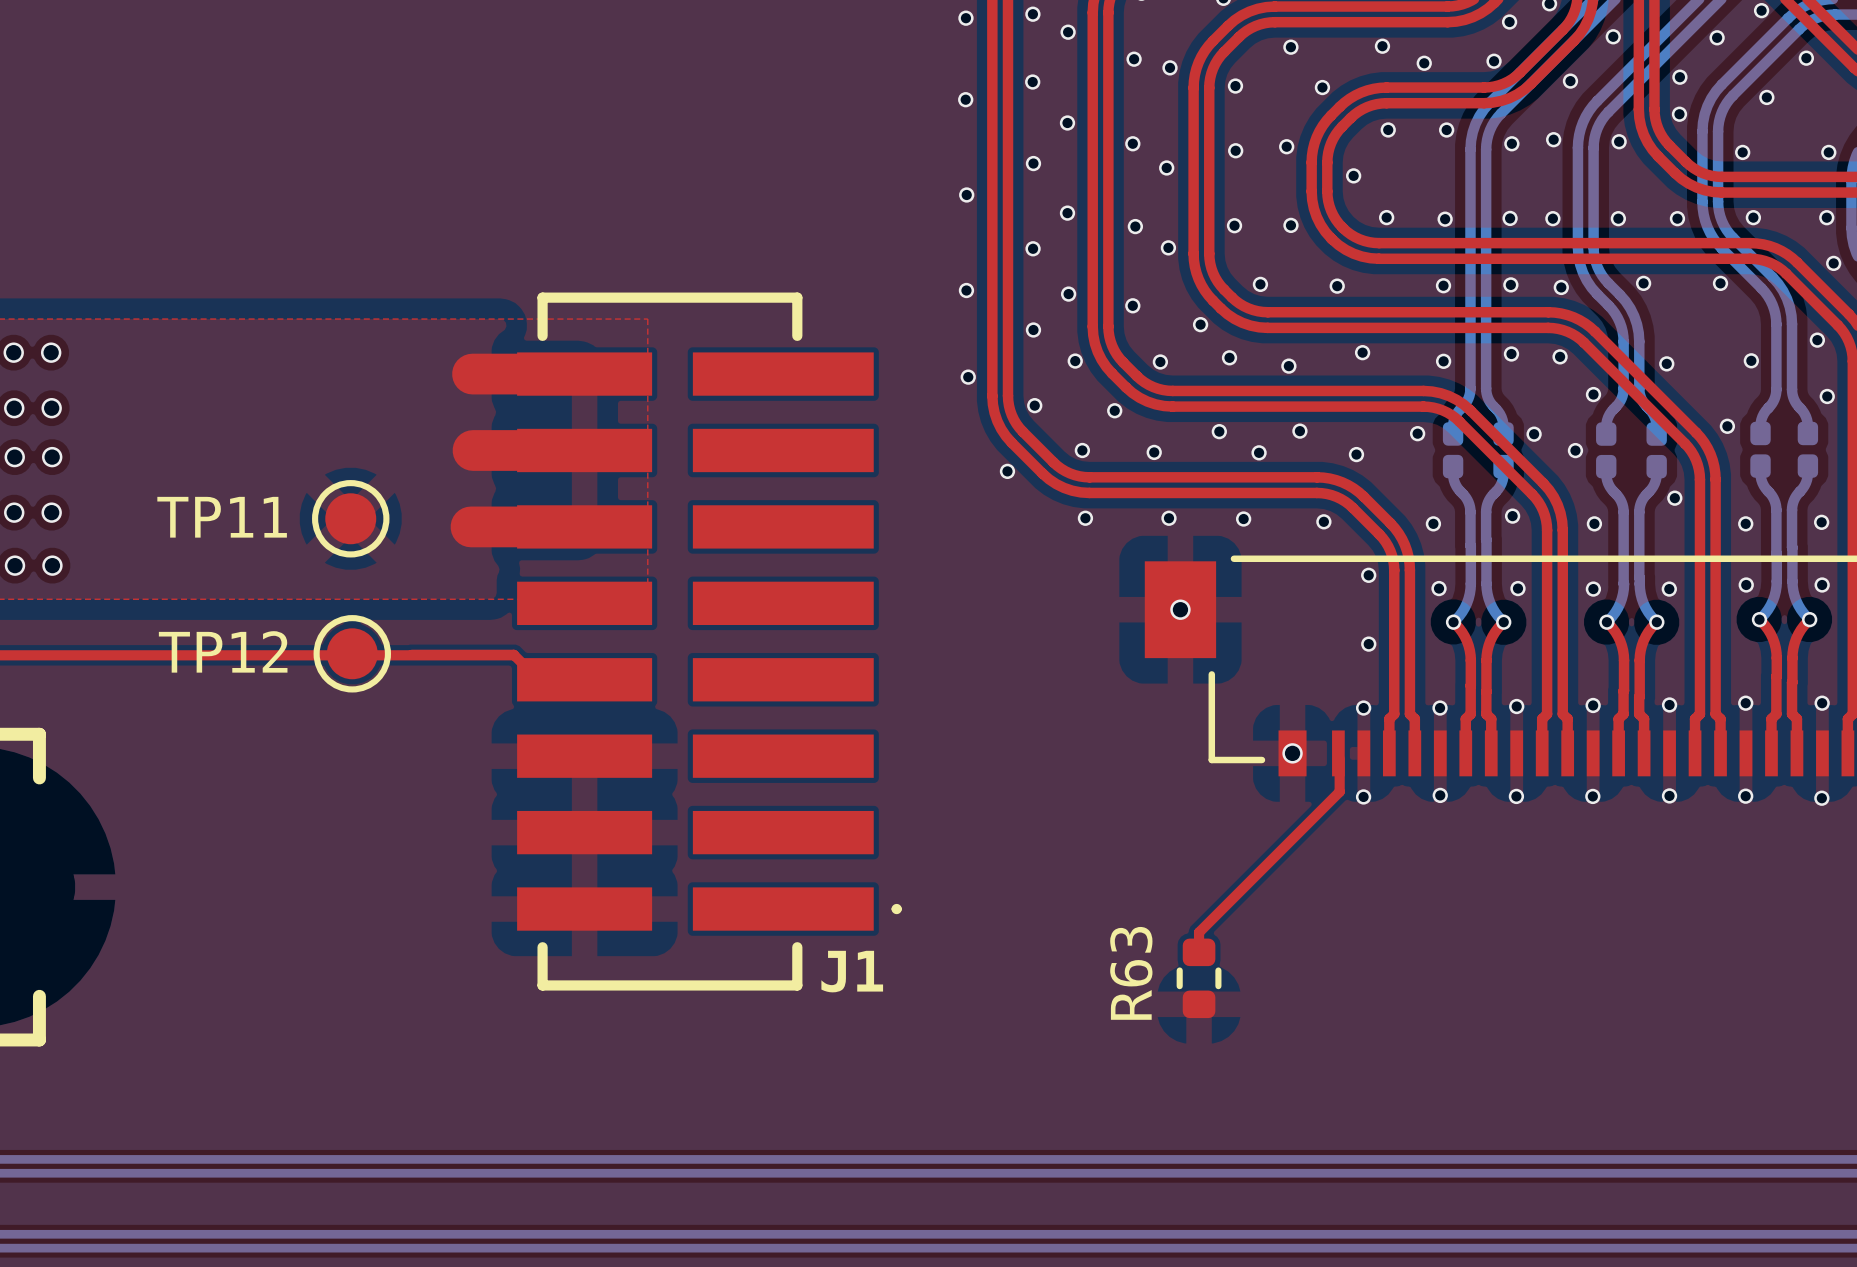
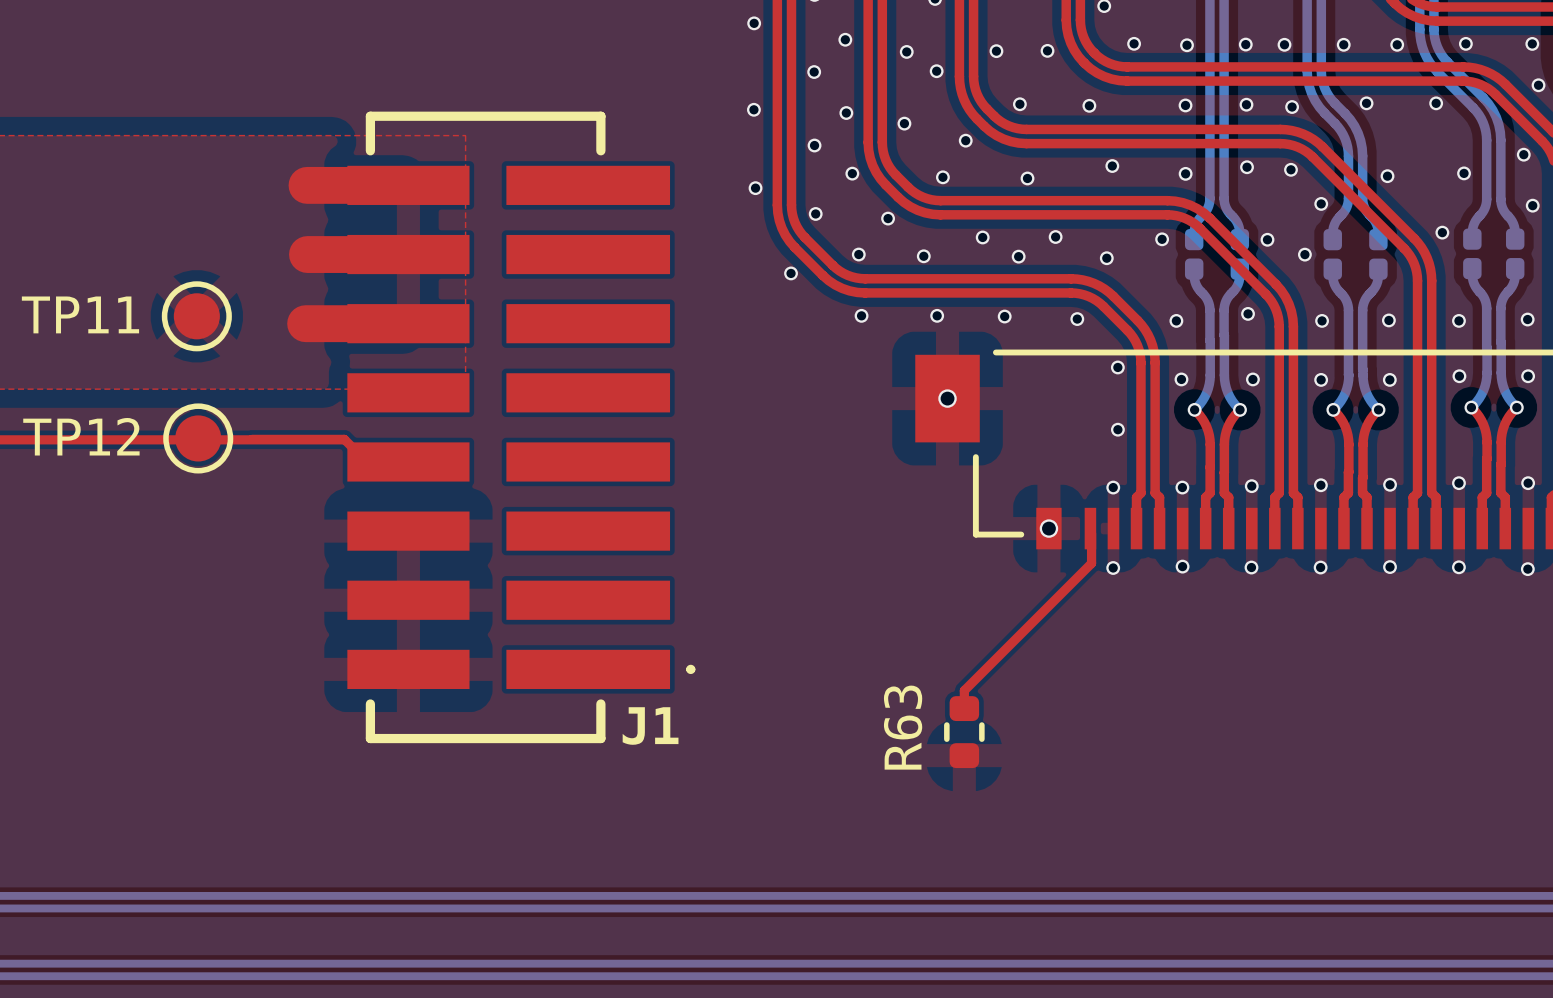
via: (1229, 357) -> none
via position: (1160, 361) -> (942, 177)
via: none -> (1027, 178)
via: (1288, 366) -> none
via position: (1674, 498) -> (1388, 320)

